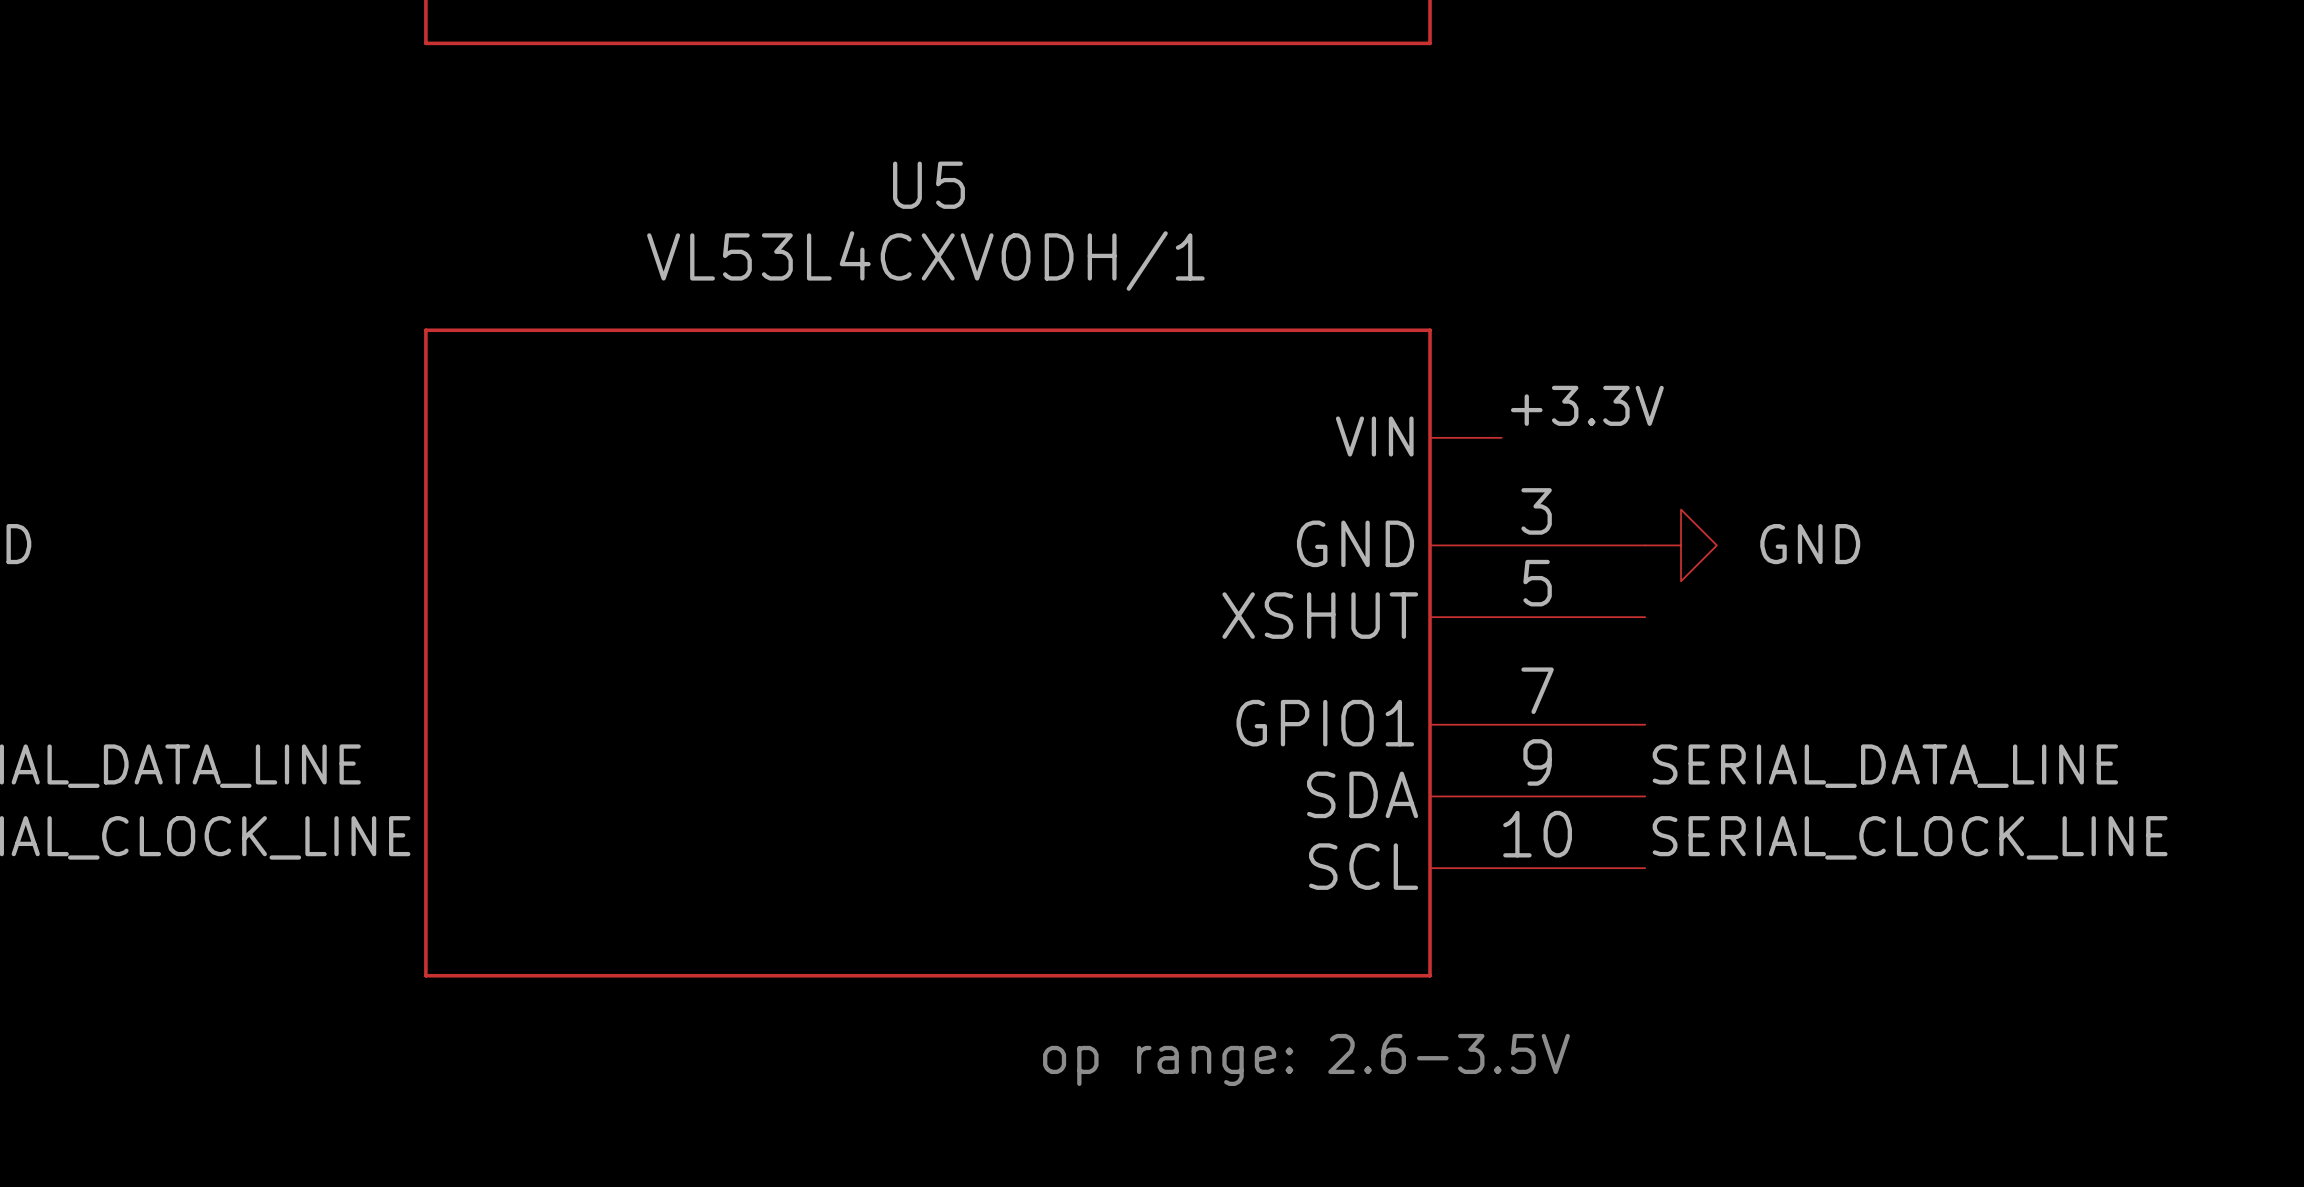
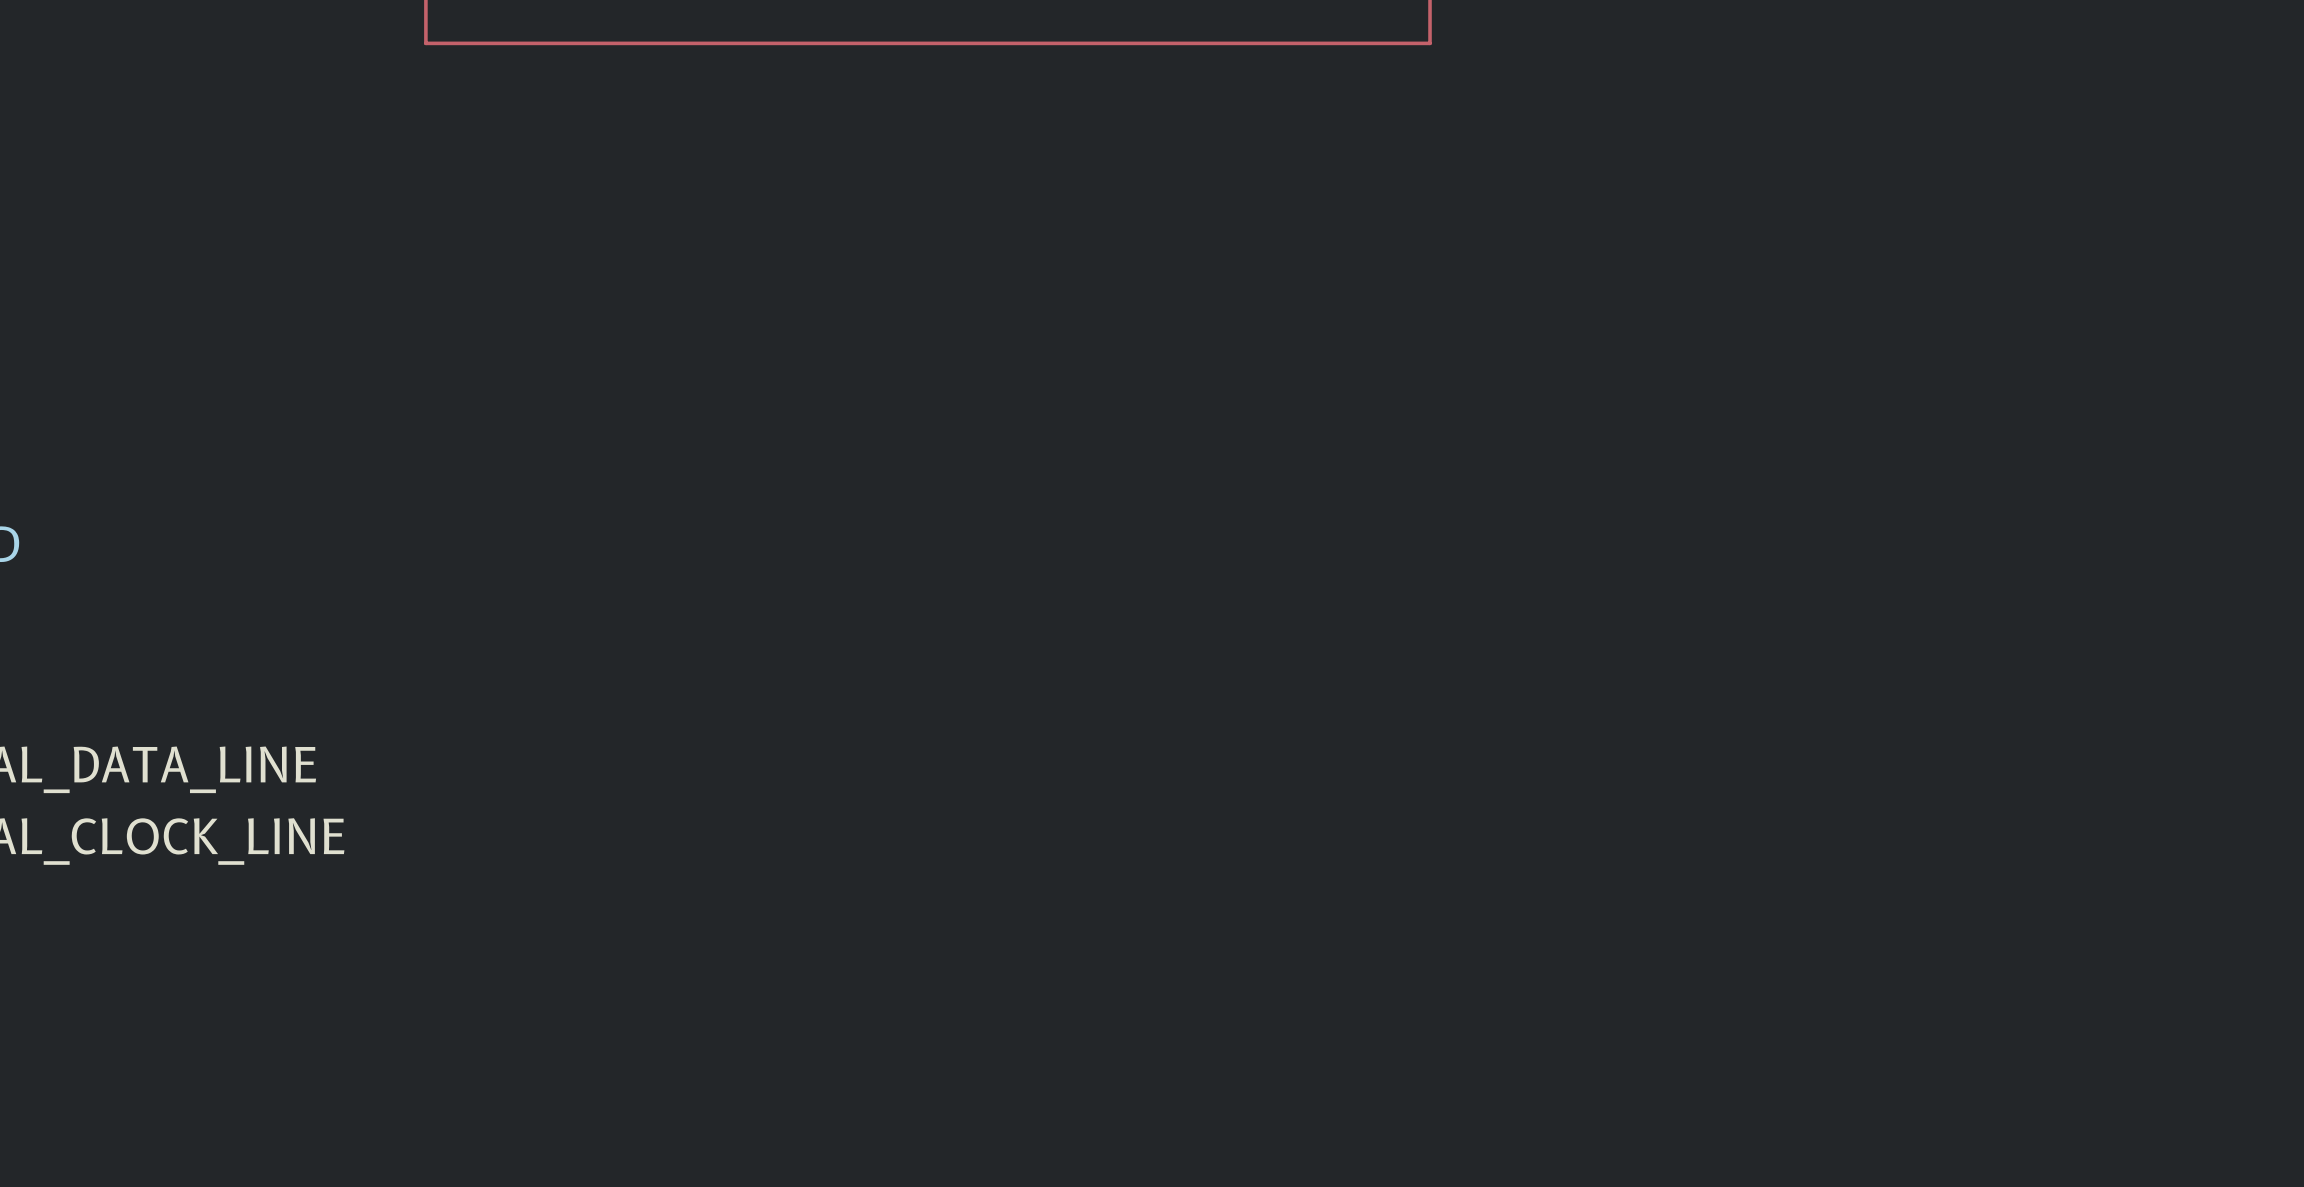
label: +3.3V (1587, 405) -> none
power symbol: GND (1681, 545) -> none
U5: VL53L4CXV0DH/1 (1034, 653) -> none
label: SERIAL_DATA_LINE (1885, 766) -> none
label: SERIAL_CLOCK_LINE (1910, 837) -> none
text: op range: 2.6-3.5V (1306, 1059) -> none

